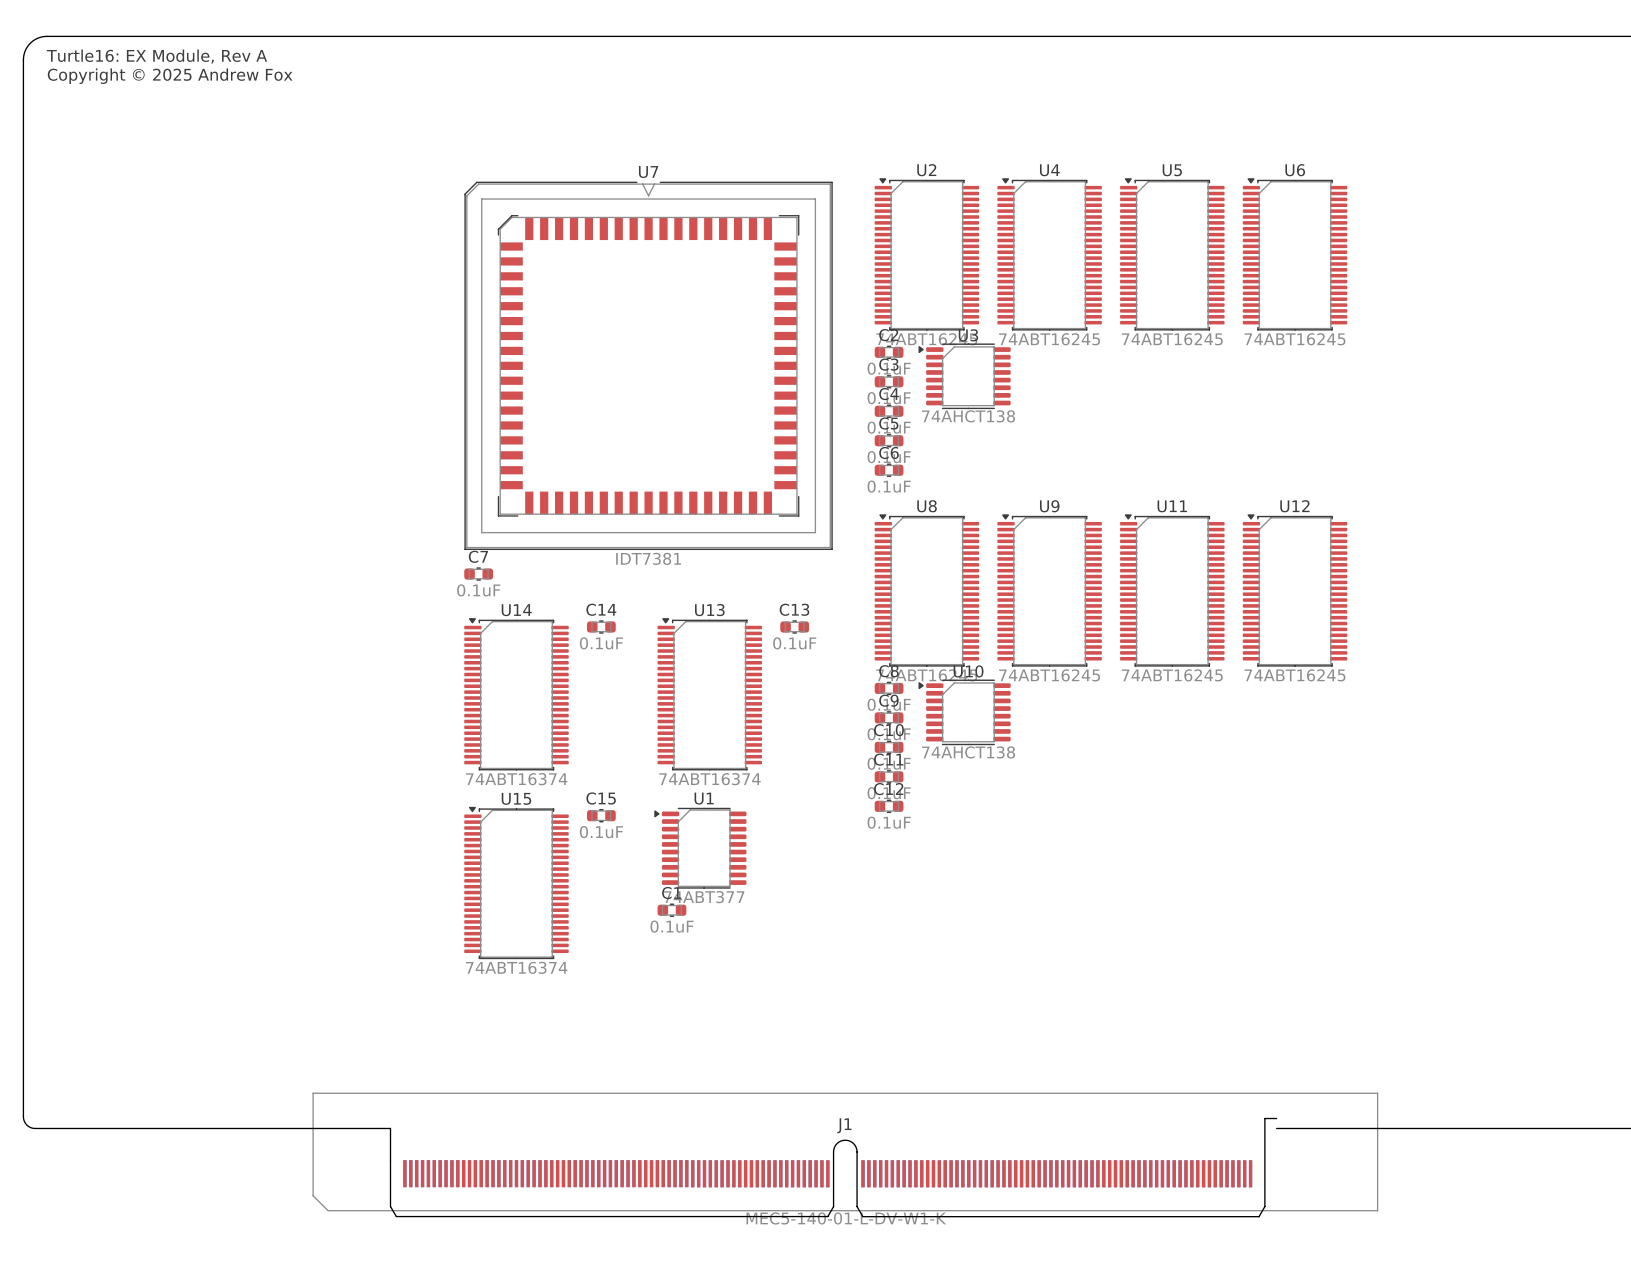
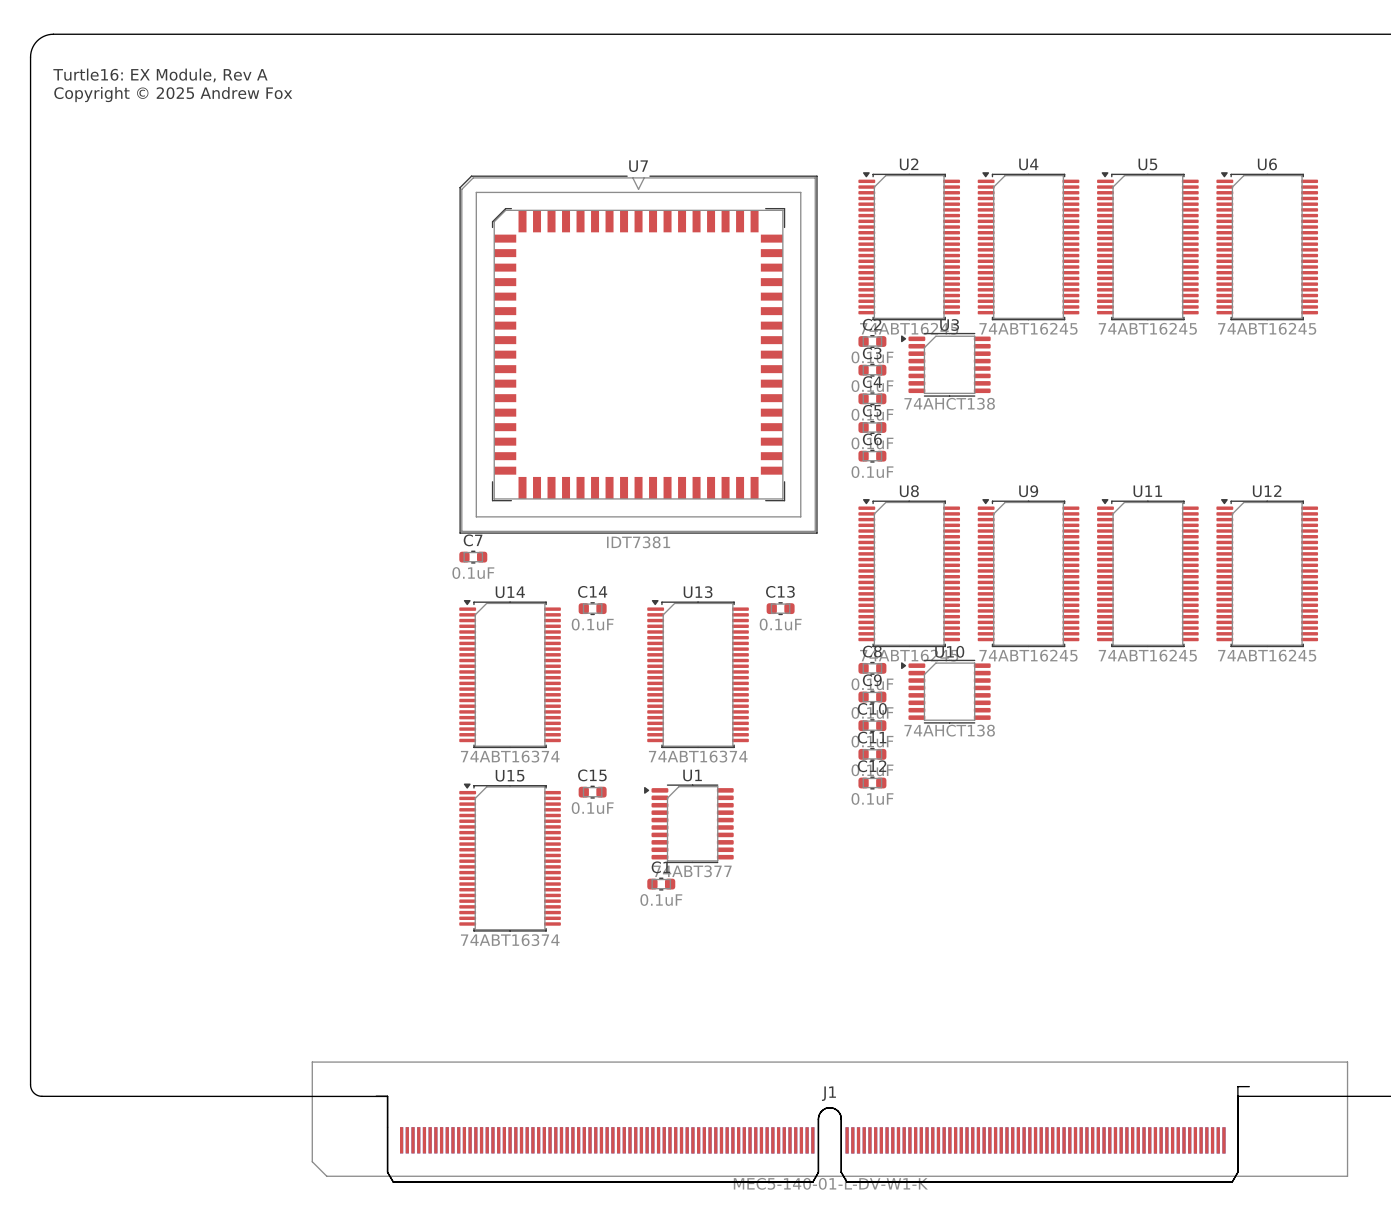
text position: Turtle16: EX Module, Rev A (156, 56) -> Turtle16: EX Module, Rev A (160, 75)
text position: Copyright © 2025 Andrew Fox (170, 76) -> Copyright © 2025 Andrew Fox (173, 94)
board edge: (35, 1128) (378, 1128) -> (41, 1096) (387, 1096) (387, 1172) (393, 1181) (812, 1181) (818, 1172) (818, 1117) (823, 1109) (830, 1107) (838, 1111) (841, 1118) (841, 1172) (846, 1182) (1232, 1182) (1237, 1172) (1237, 1096) (1249, 1096)

